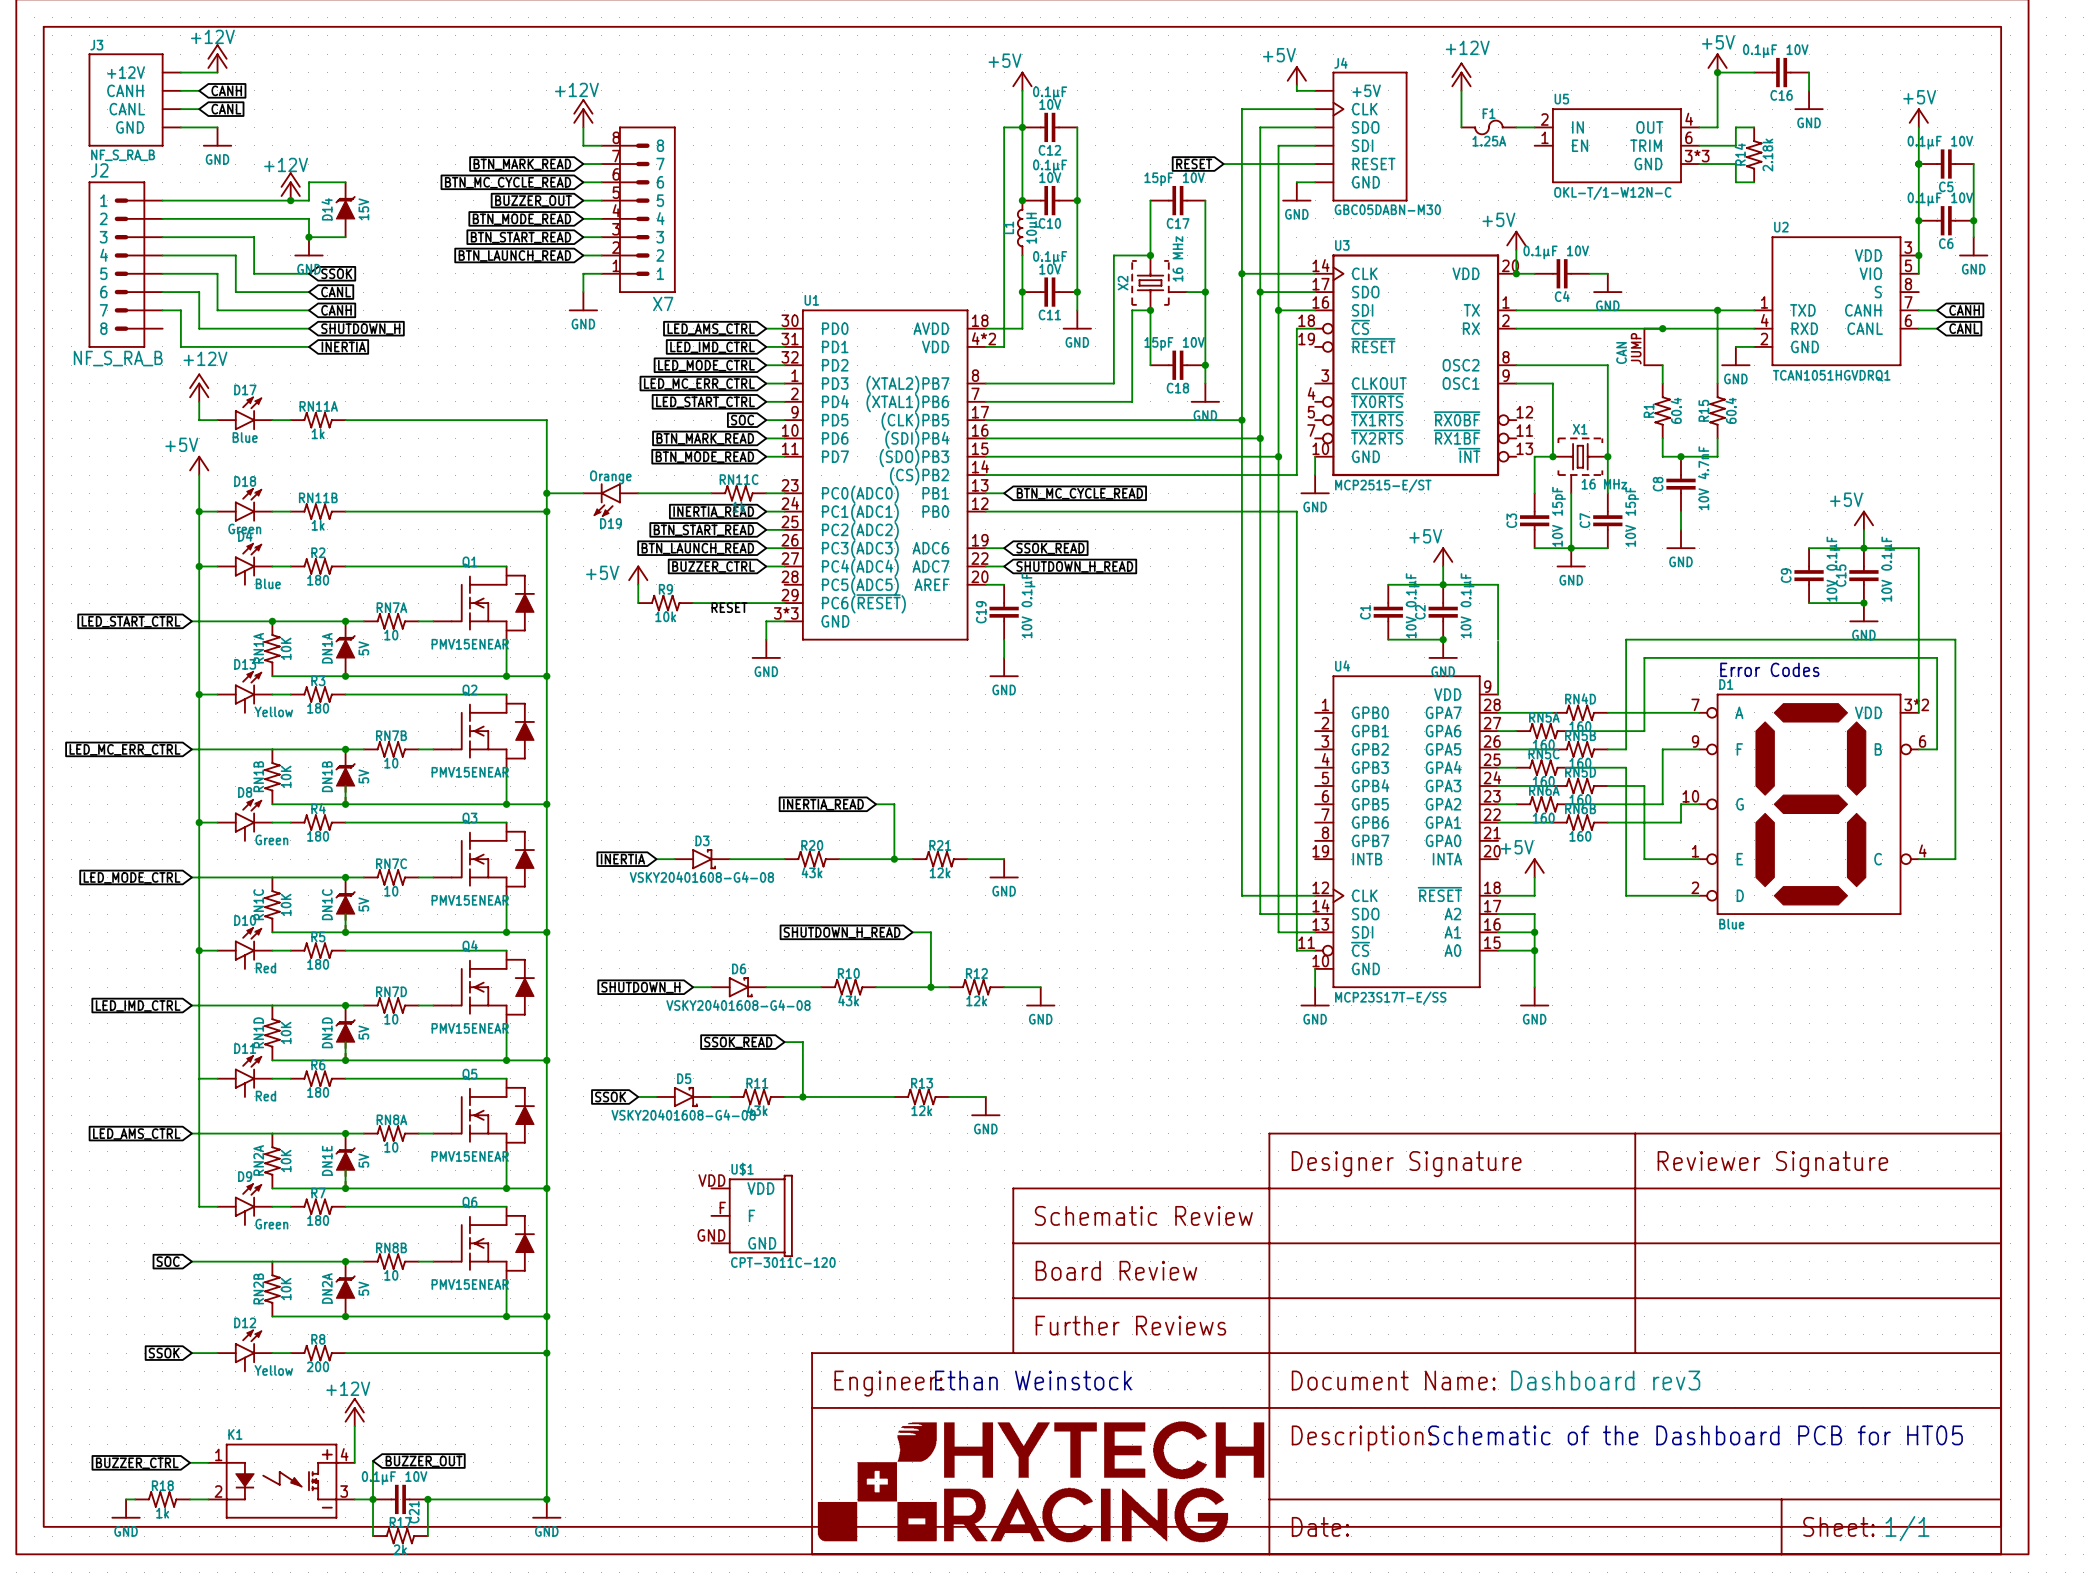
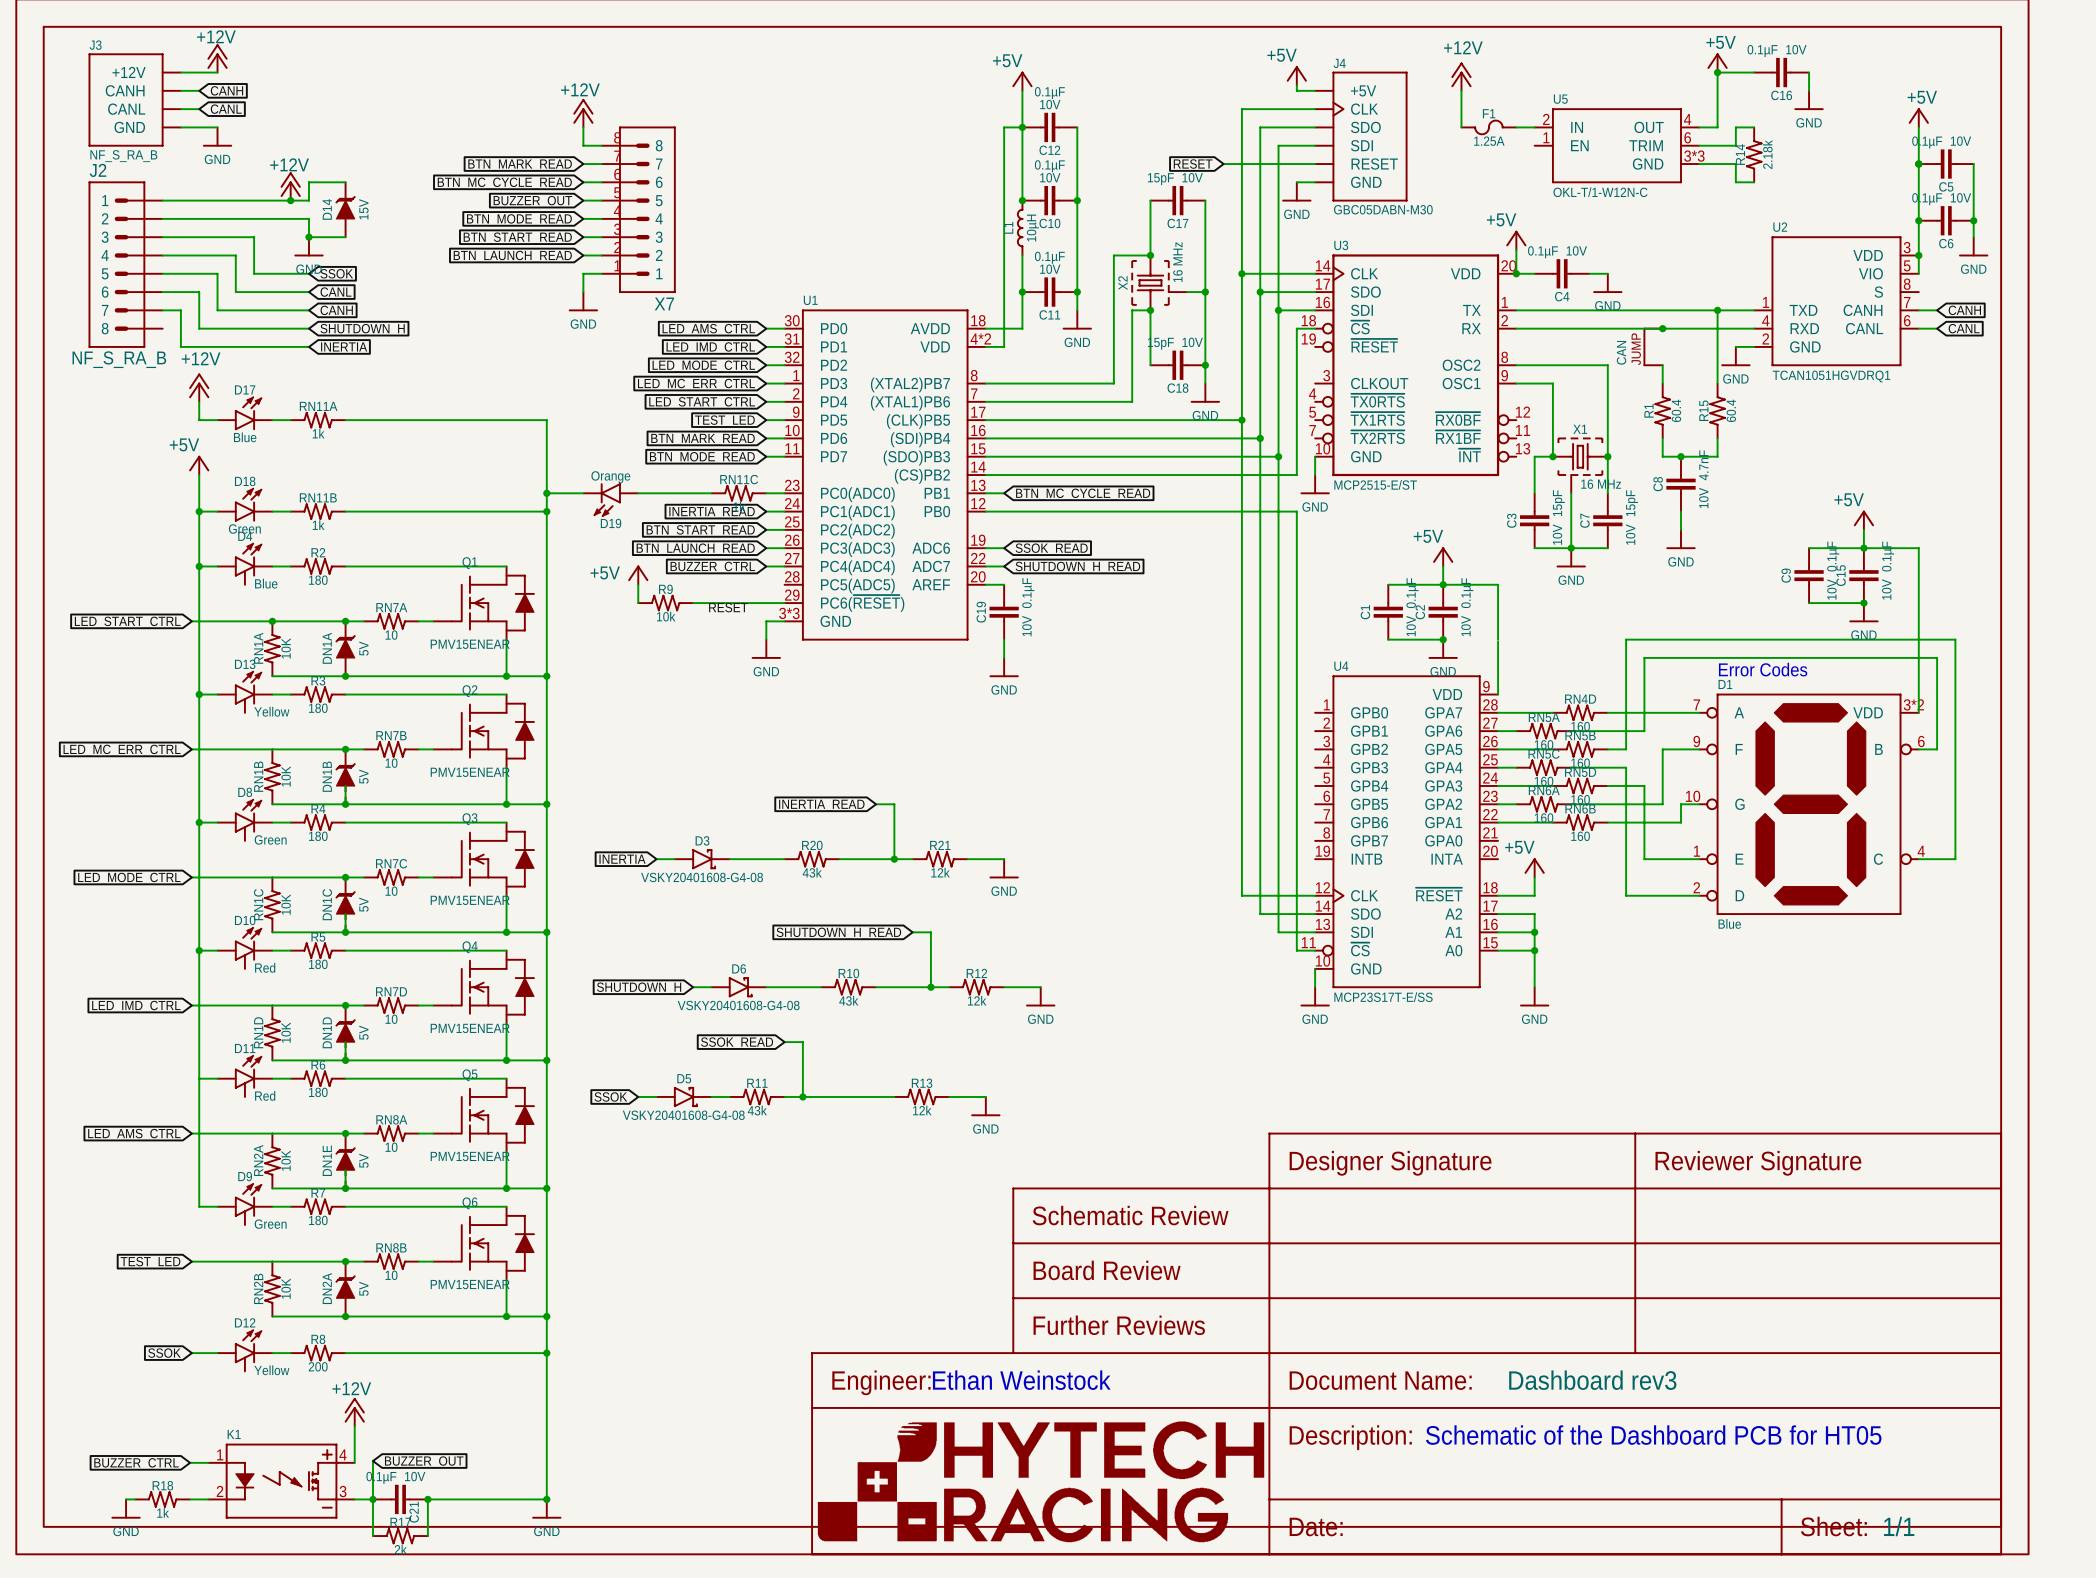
global label: SOC (742, 420) -> TEST_LED (724, 421)
U$1: (752, 1215) -> none
global label: SOC (168, 1261) -> TEST_LED (150, 1262)

